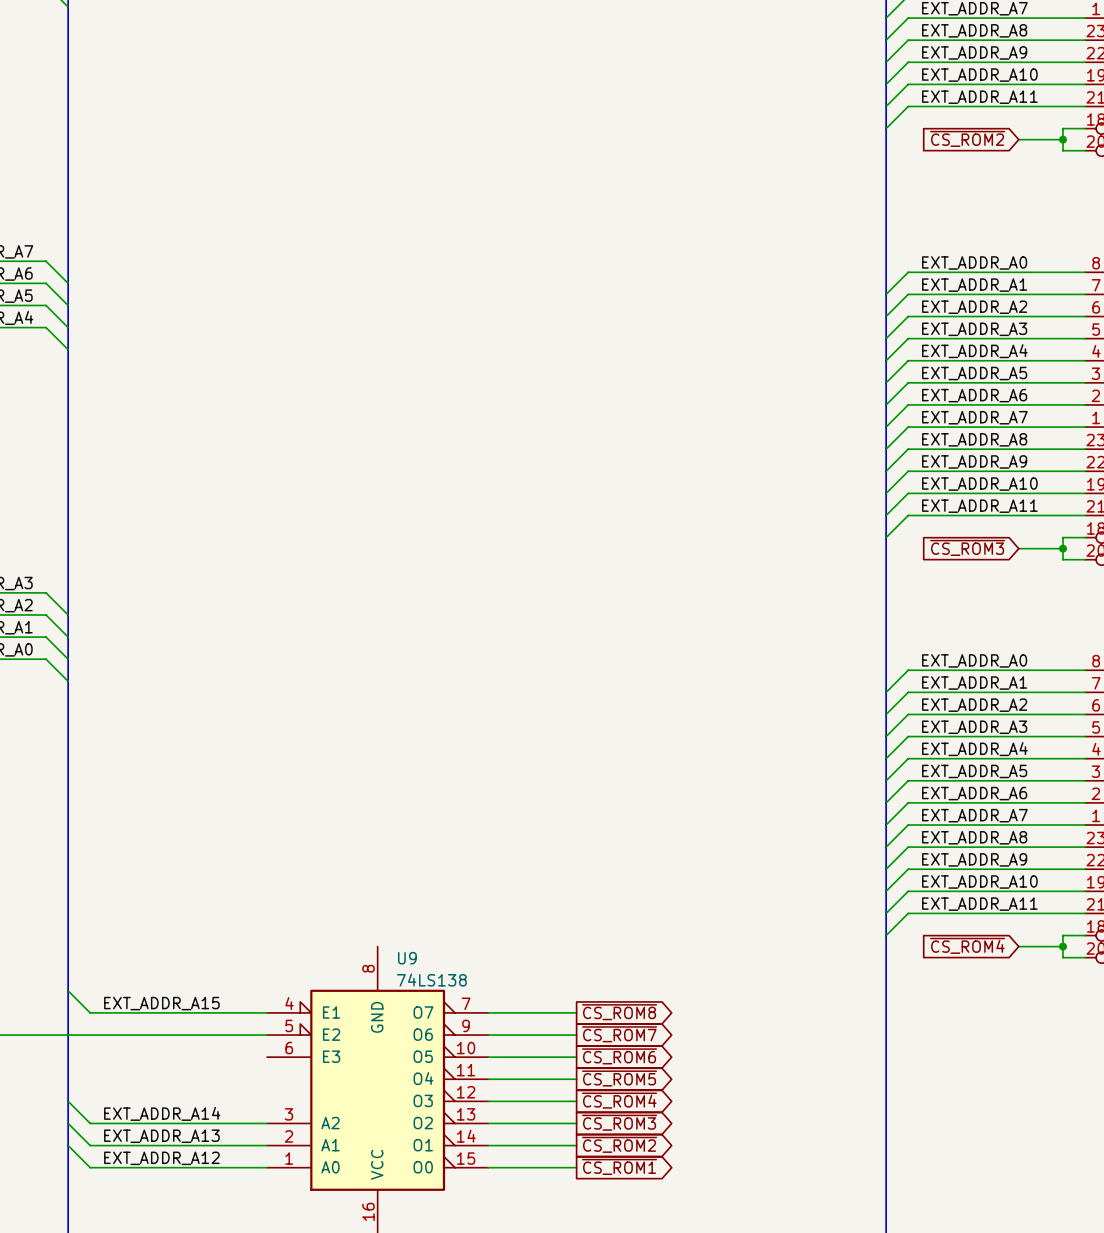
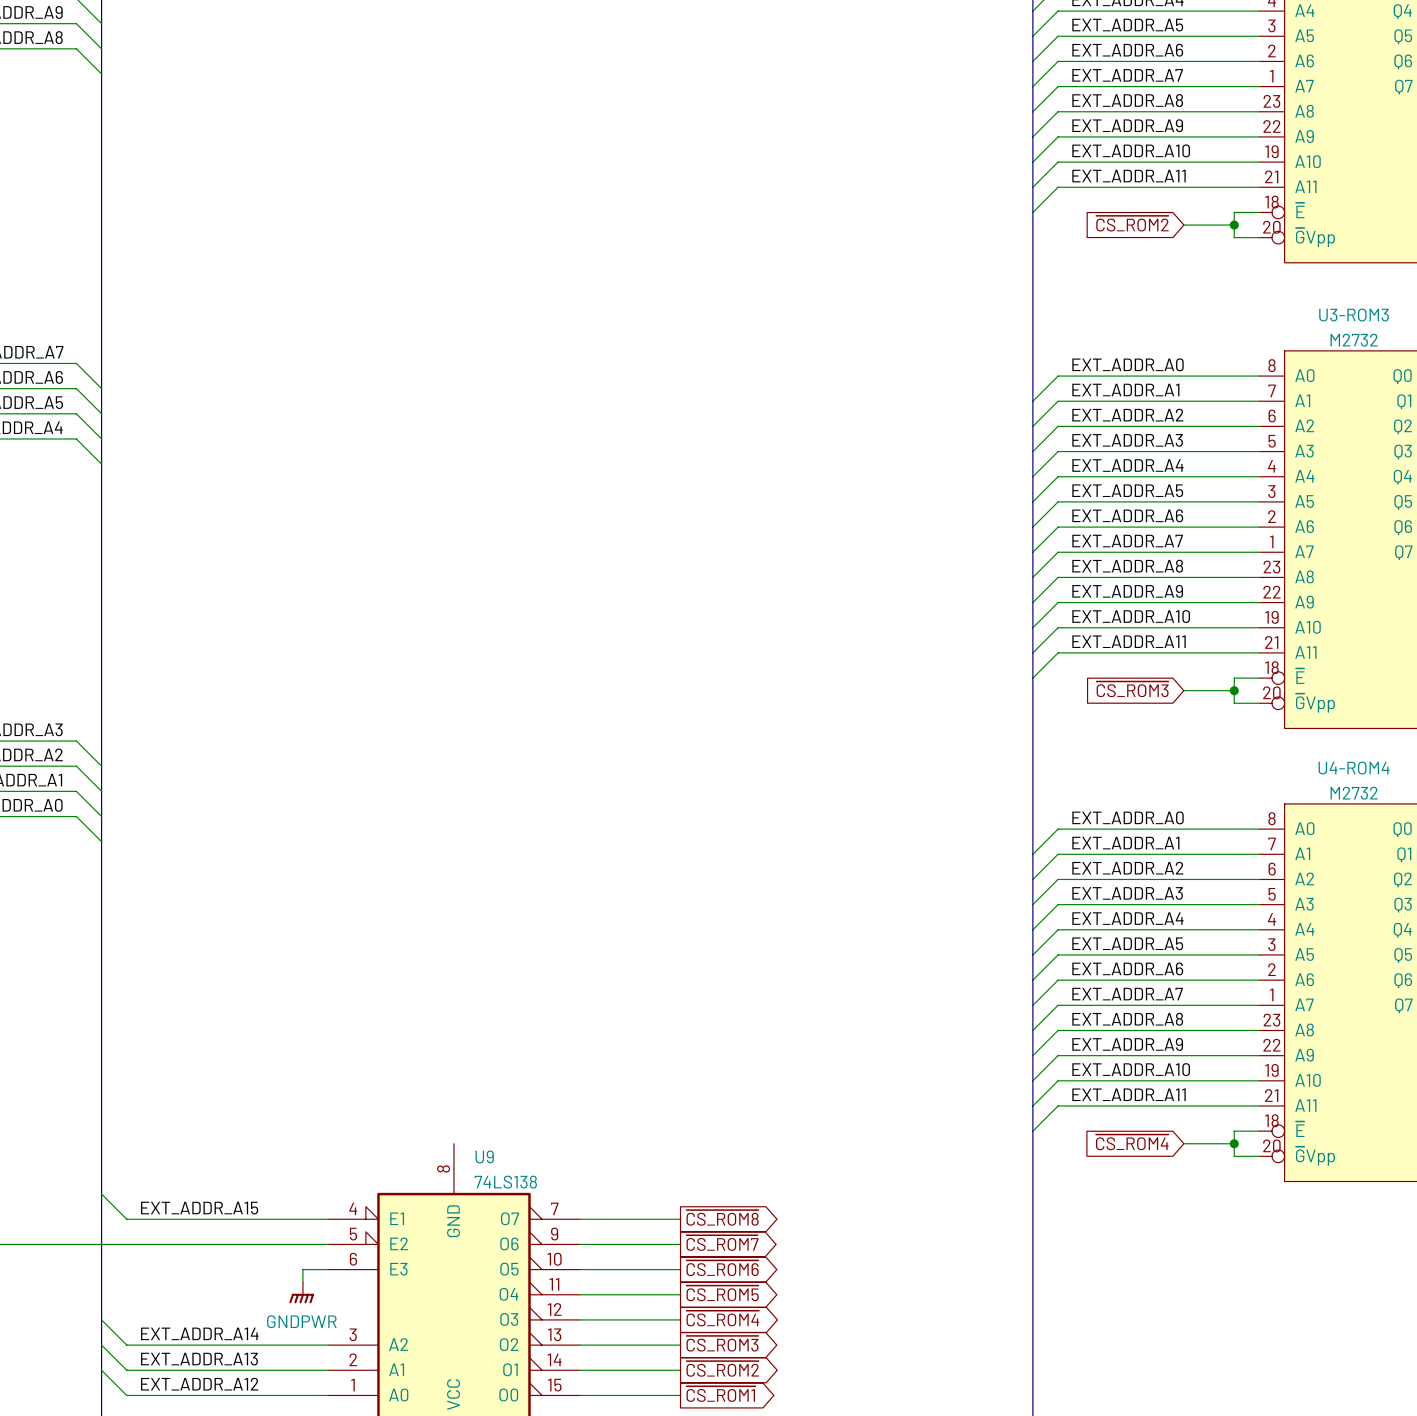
wire: none -> (328, 1269) (302, 1269) (302, 1282)
power symbol: none -> GNDPWR (301, 1292)

